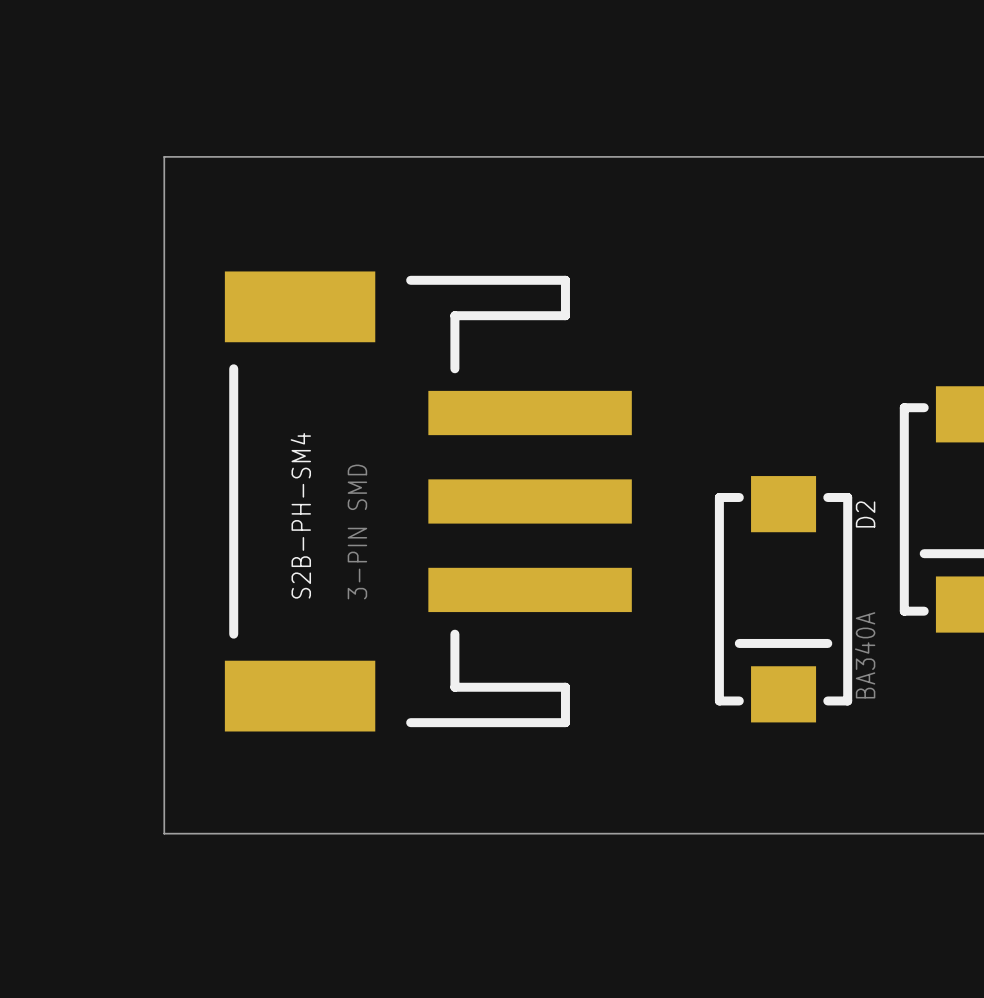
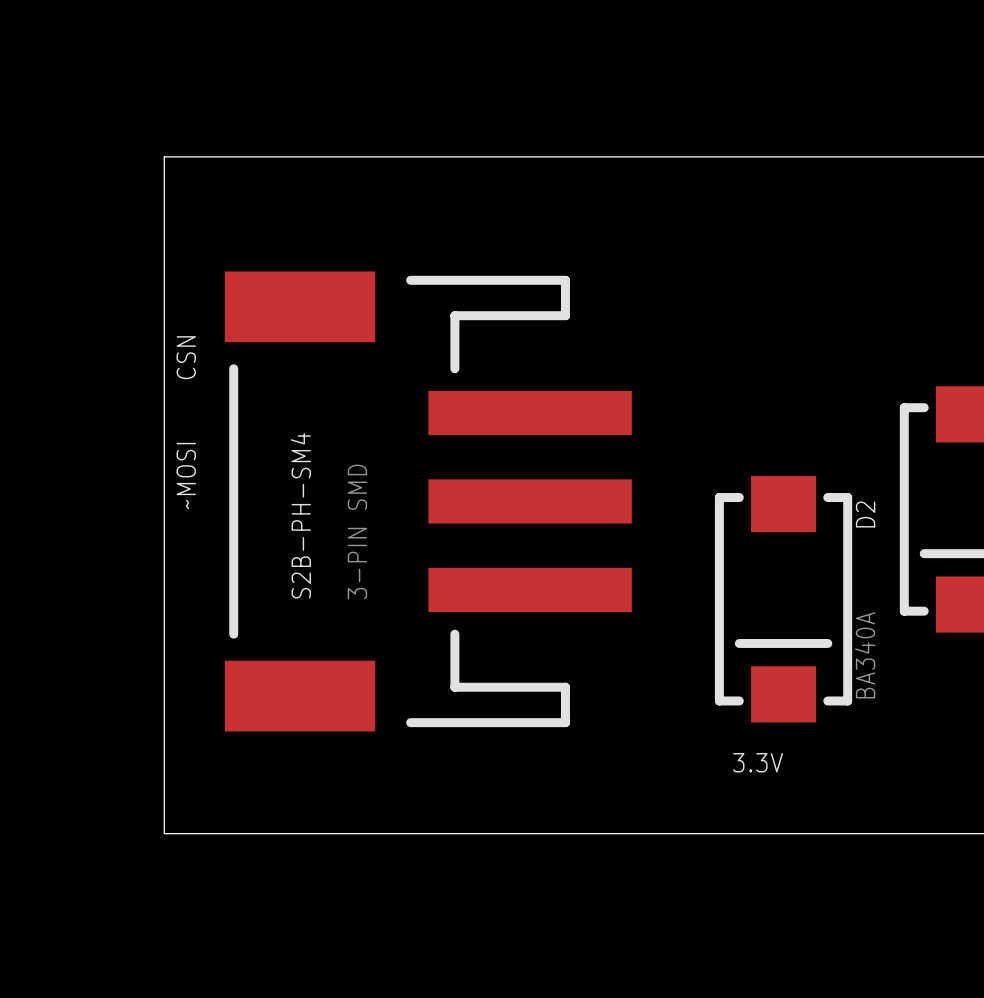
text: none -> CSN (186, 357)
text: none -> ~MOSI (186, 475)
text: none -> 3.3V (757, 762)

